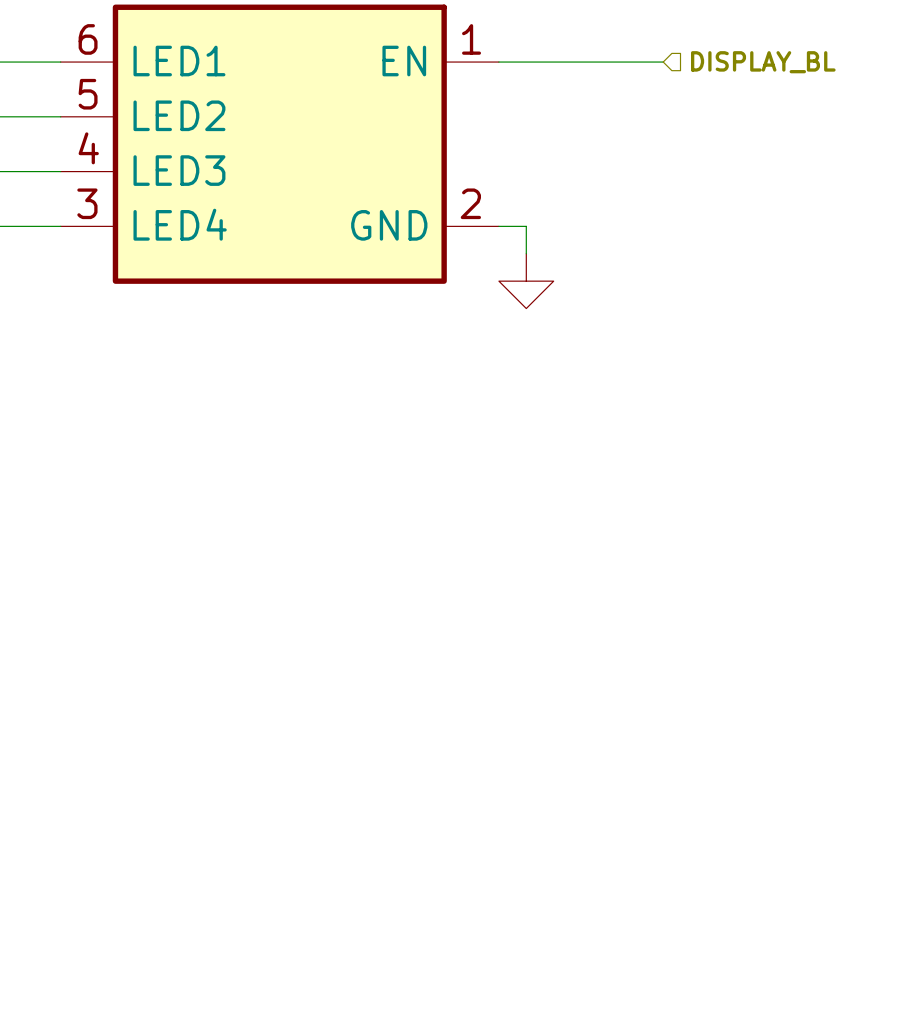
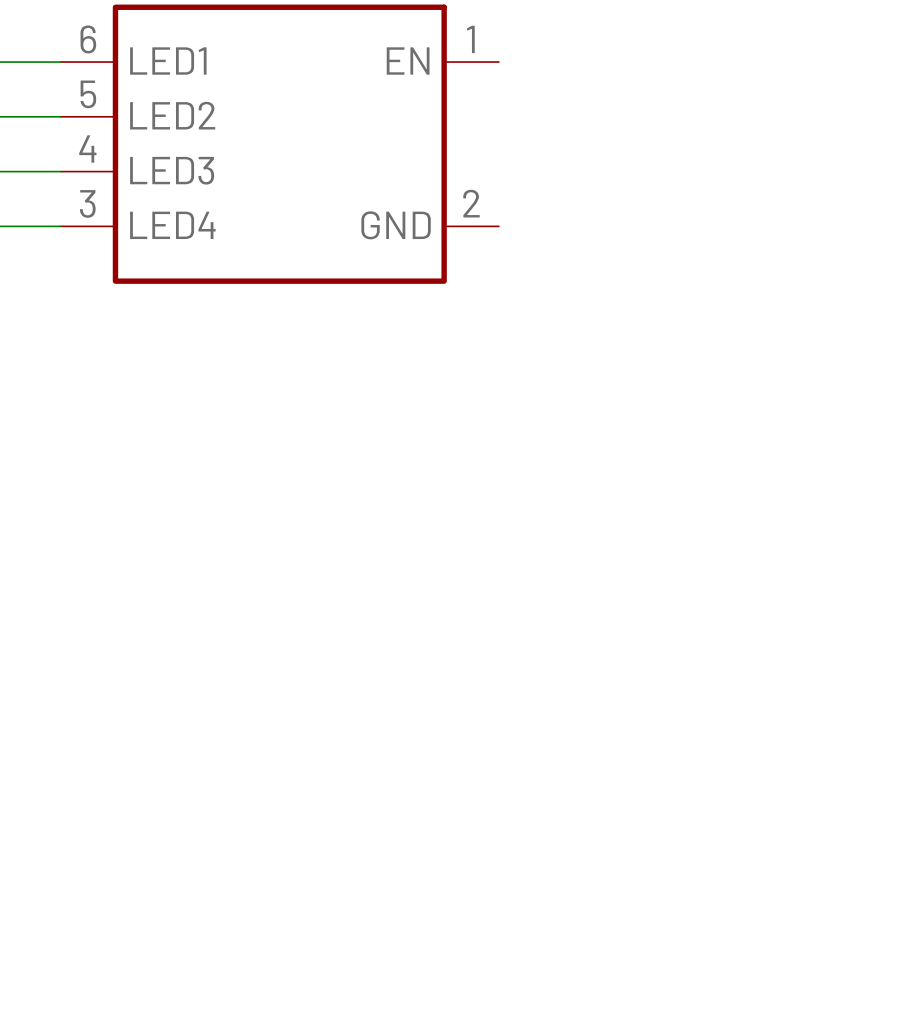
wire: (498, 62) (663, 62) -> none
hierarchical label: DISPLAY_BL (763, 62) -> none
wire: (498, 226) (526, 226) (526, 253) -> none
power symbol: (526, 281) -> none

